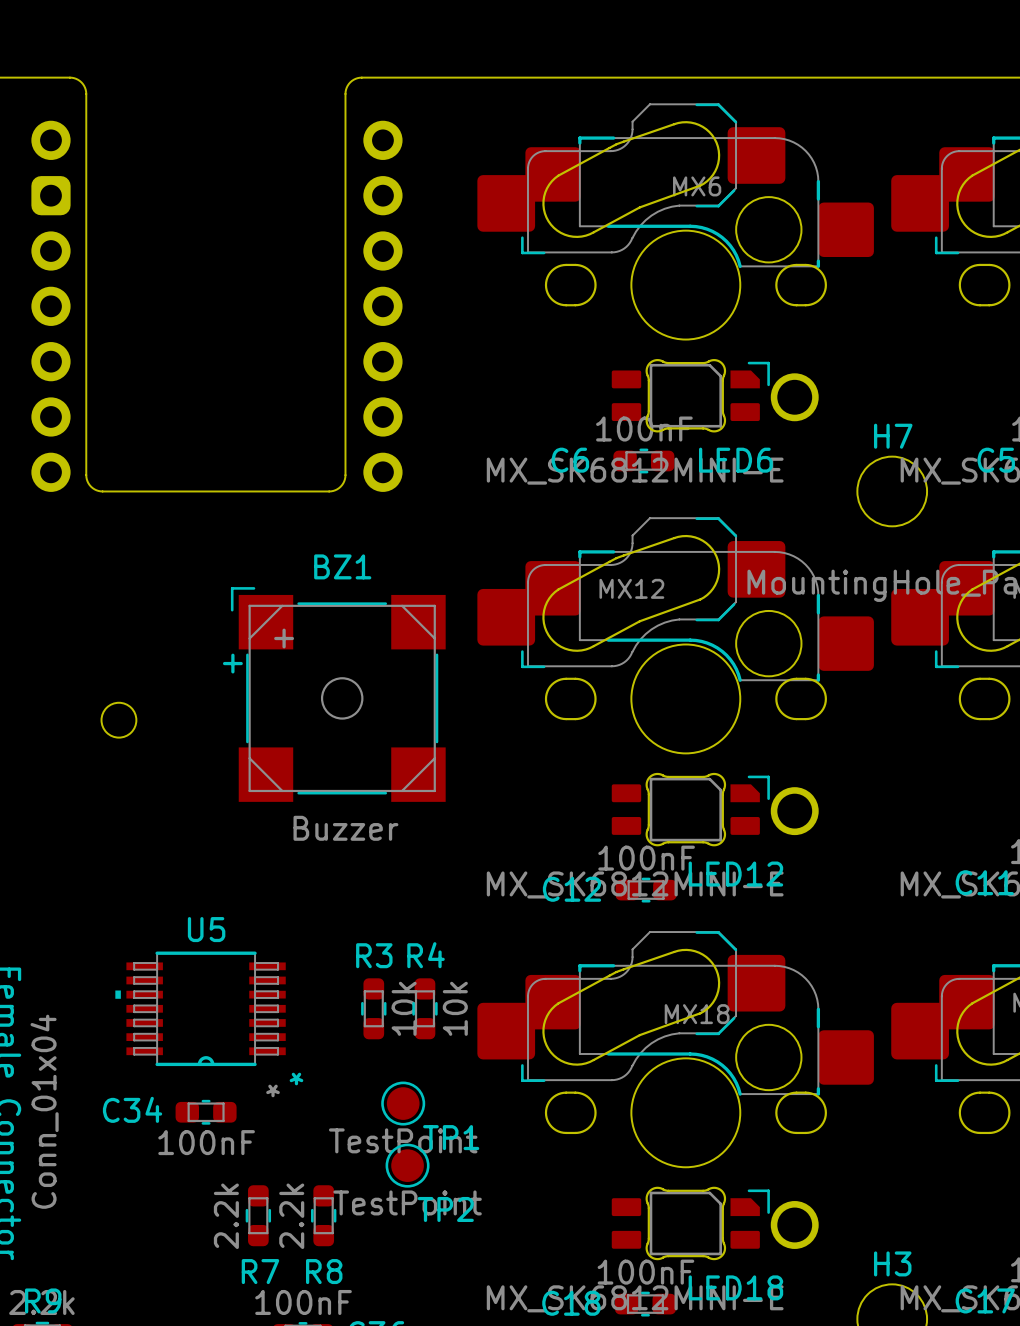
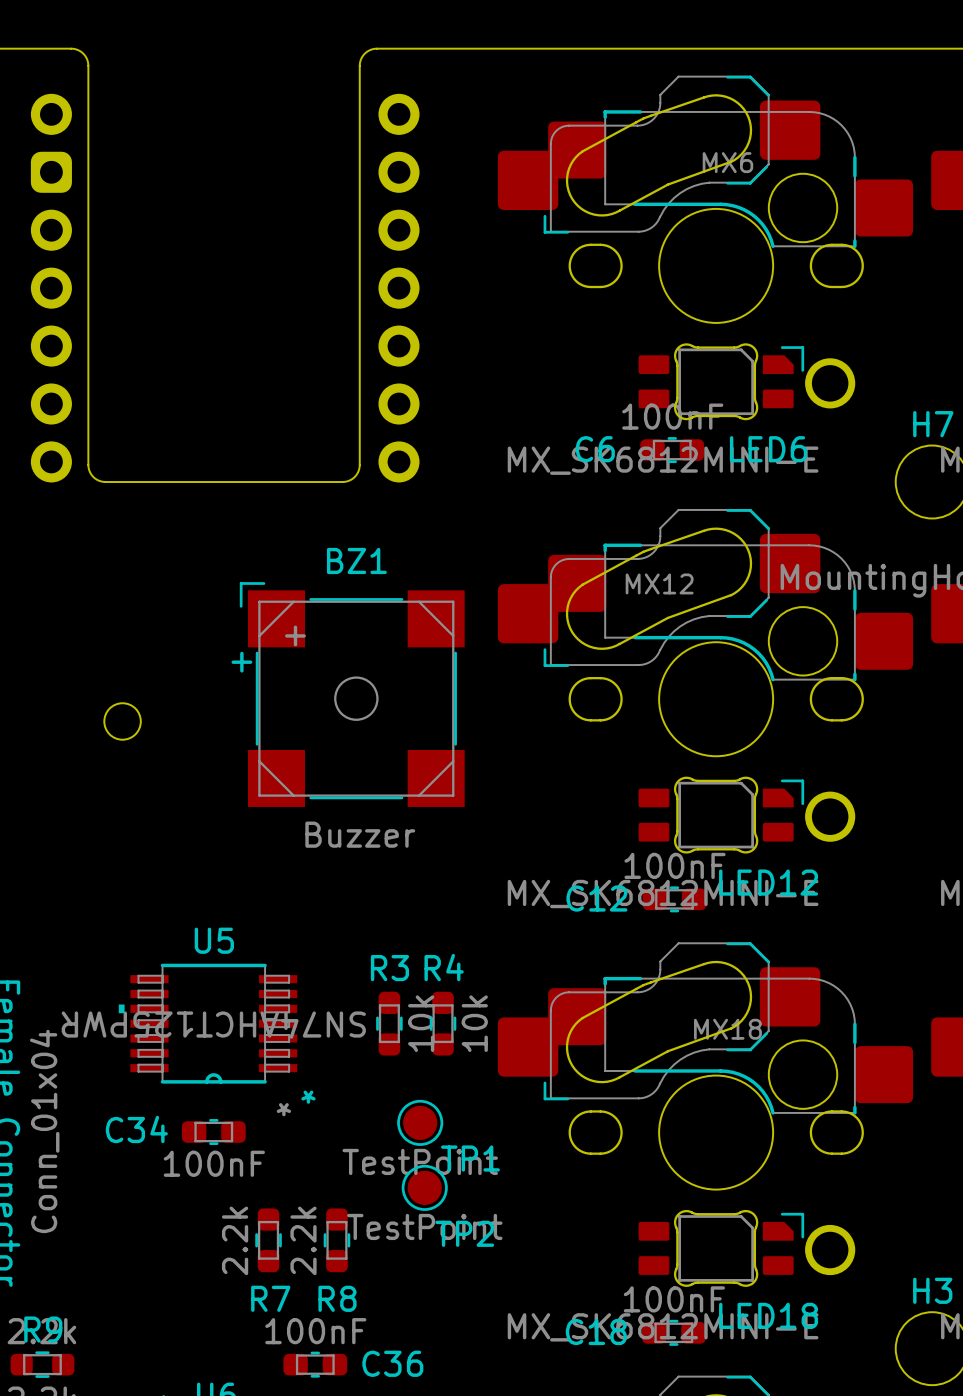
U5 value: none -> SN74AHCT125PWR (213, 1025)

